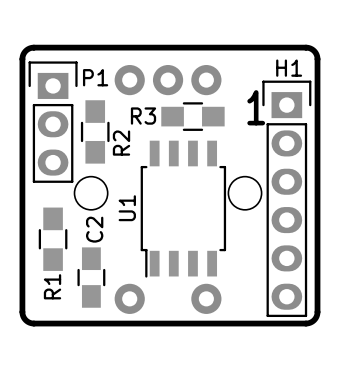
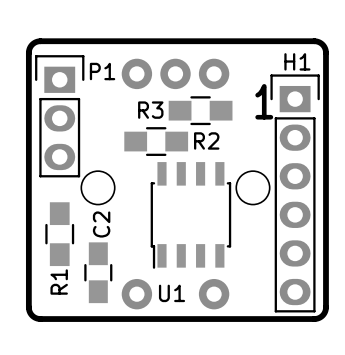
R2 rotation: 0° (95, 131) -> 90° clockwise (156, 141)
R2 position: (95, 131) -> (156, 141)
U1 footprint: [140, 140, 227, 278] -> [150, 162, 232, 269]
U1 name position: U1 (127, 208) -> U1 (172, 293)

